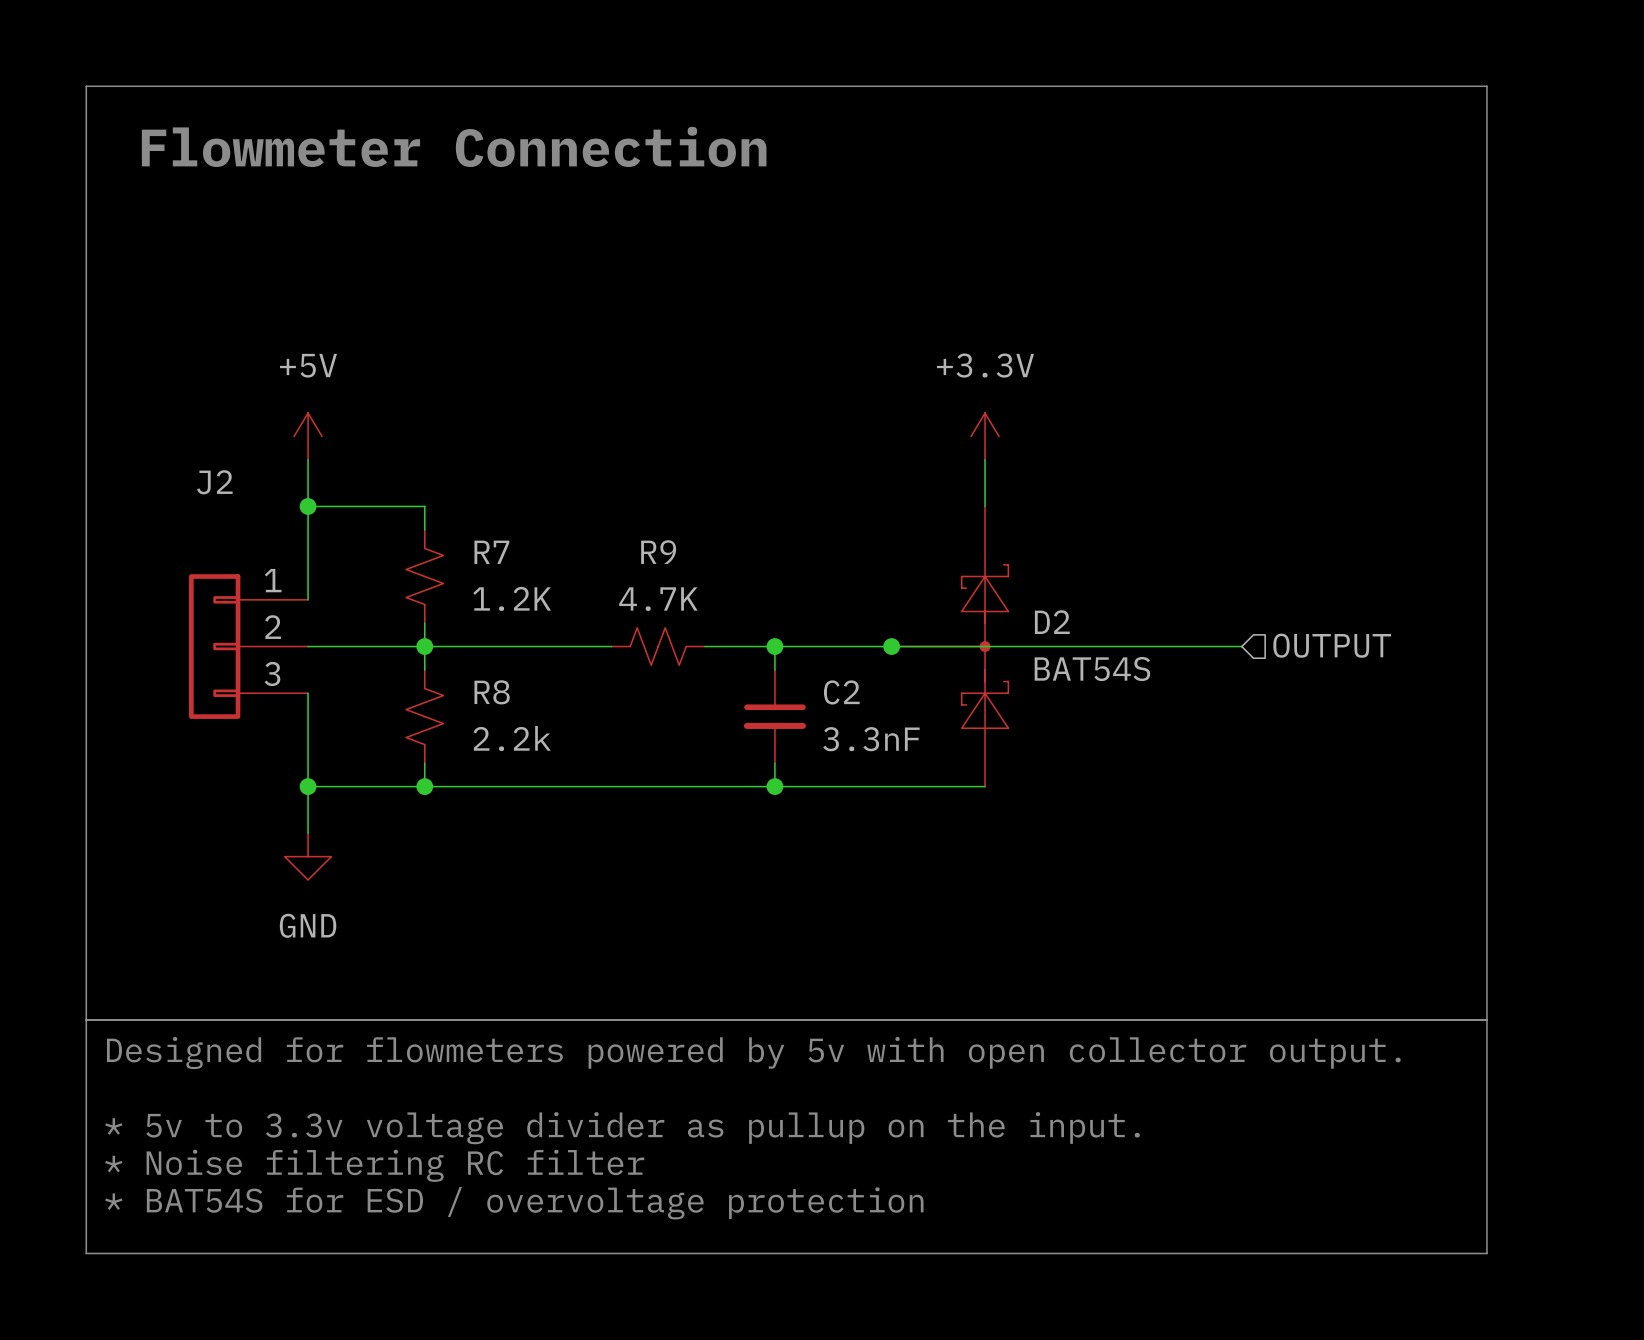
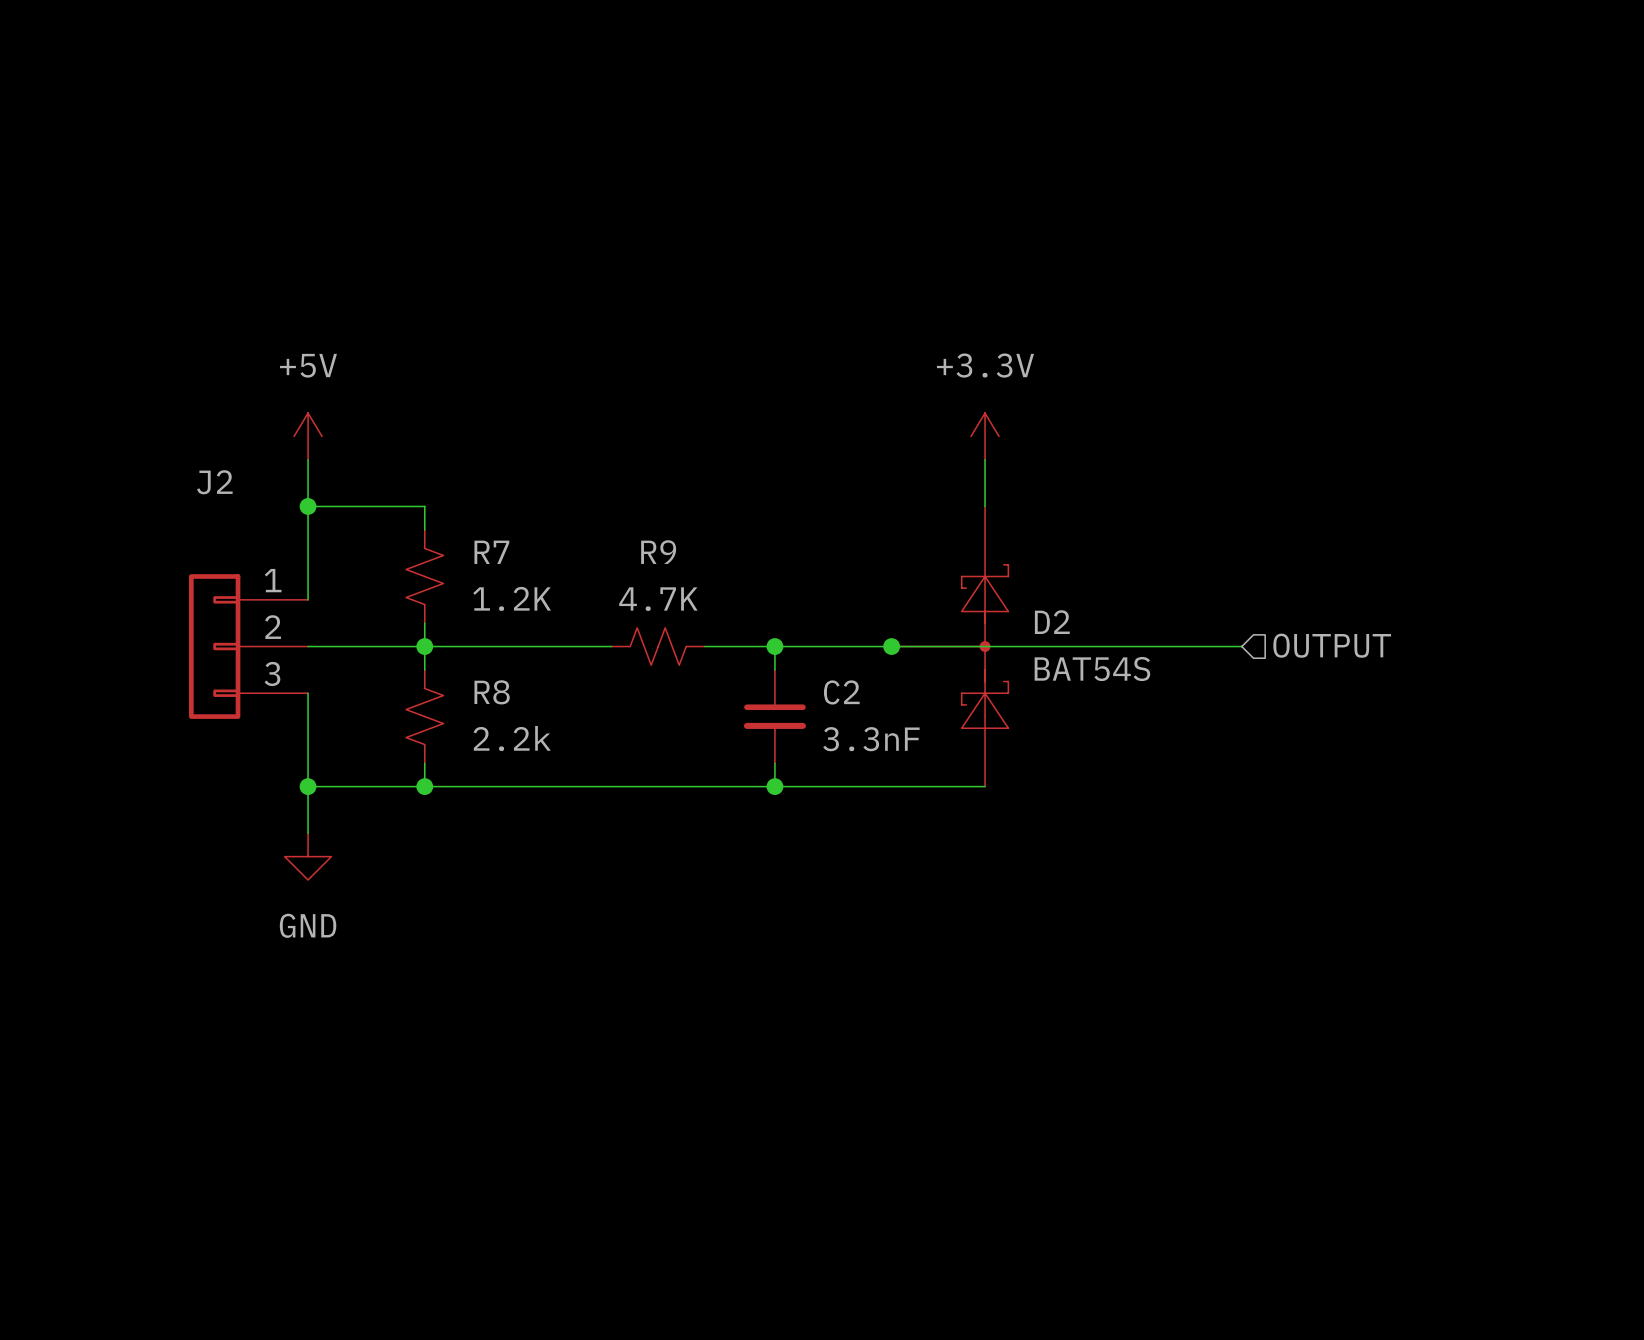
text: Flowmeter Connection (454, 146) -> none
line: (86, 1020) (1486, 1020) (1486, 1253) (86, 1253) (86, 86) (1486, 86) (1486, 1020) -> none
text: Designed for flowmeters powered by 5v with open collector output. (753, 1053) -> none
text: * 5v to 3.3v voltage divider as pullup on the input. (622, 1128) -> none
text: * Noise filtering RC filter (374, 1165) -> none
text: * BAT54S for ESD / overvoltage protection (514, 1203) -> none

